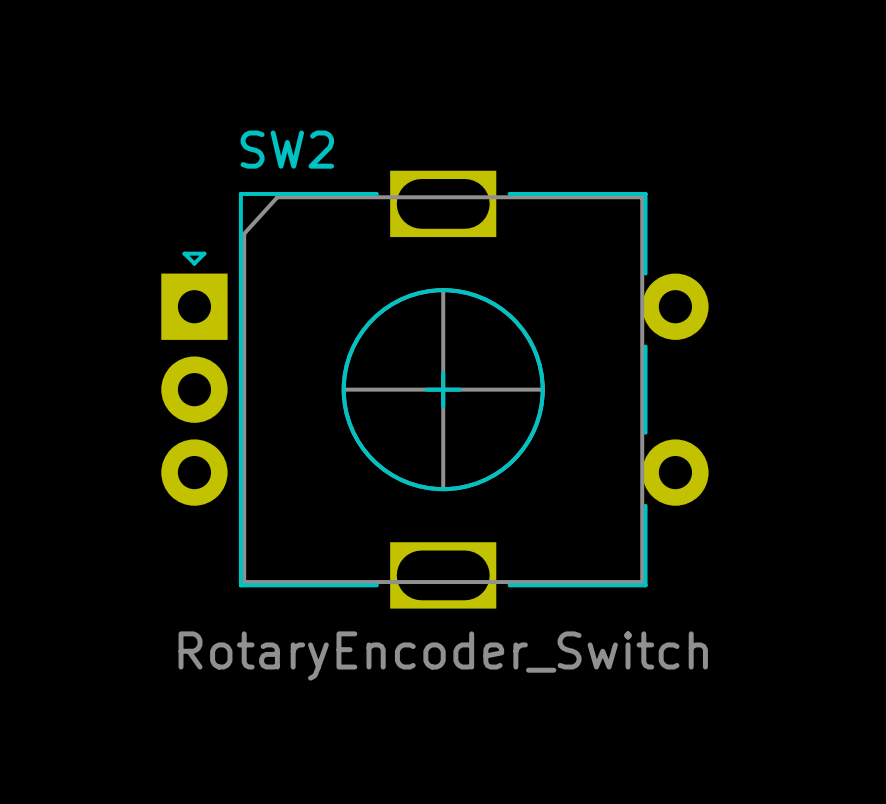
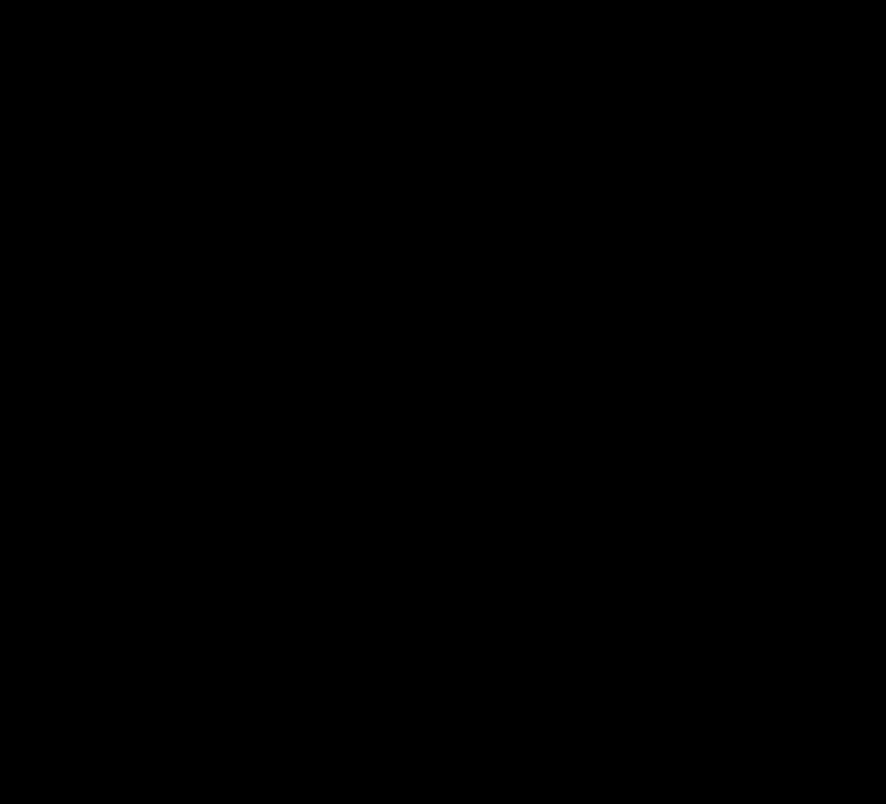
SW2: RotaryEncoder_Switch (434, 389) -> none

